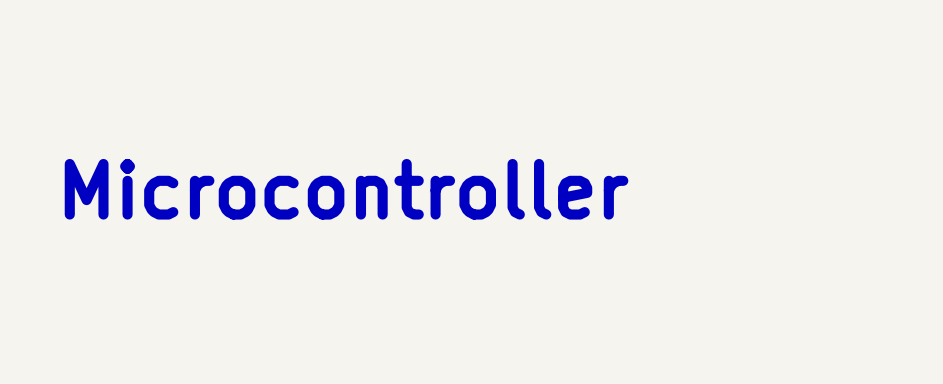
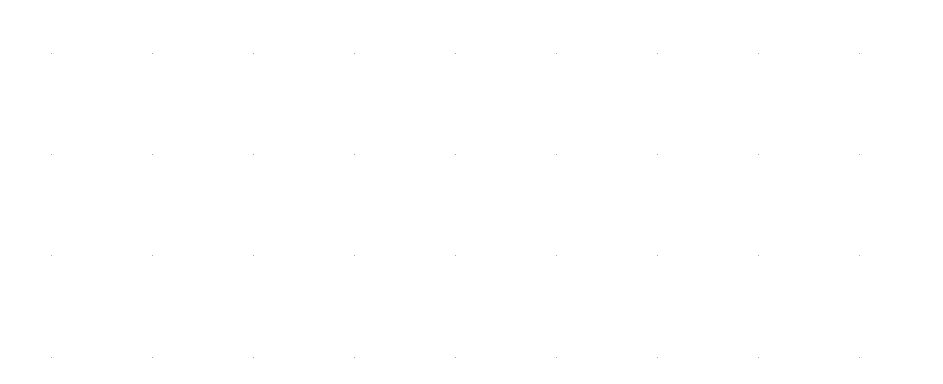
text: Microcontroller (346, 189) -> none

